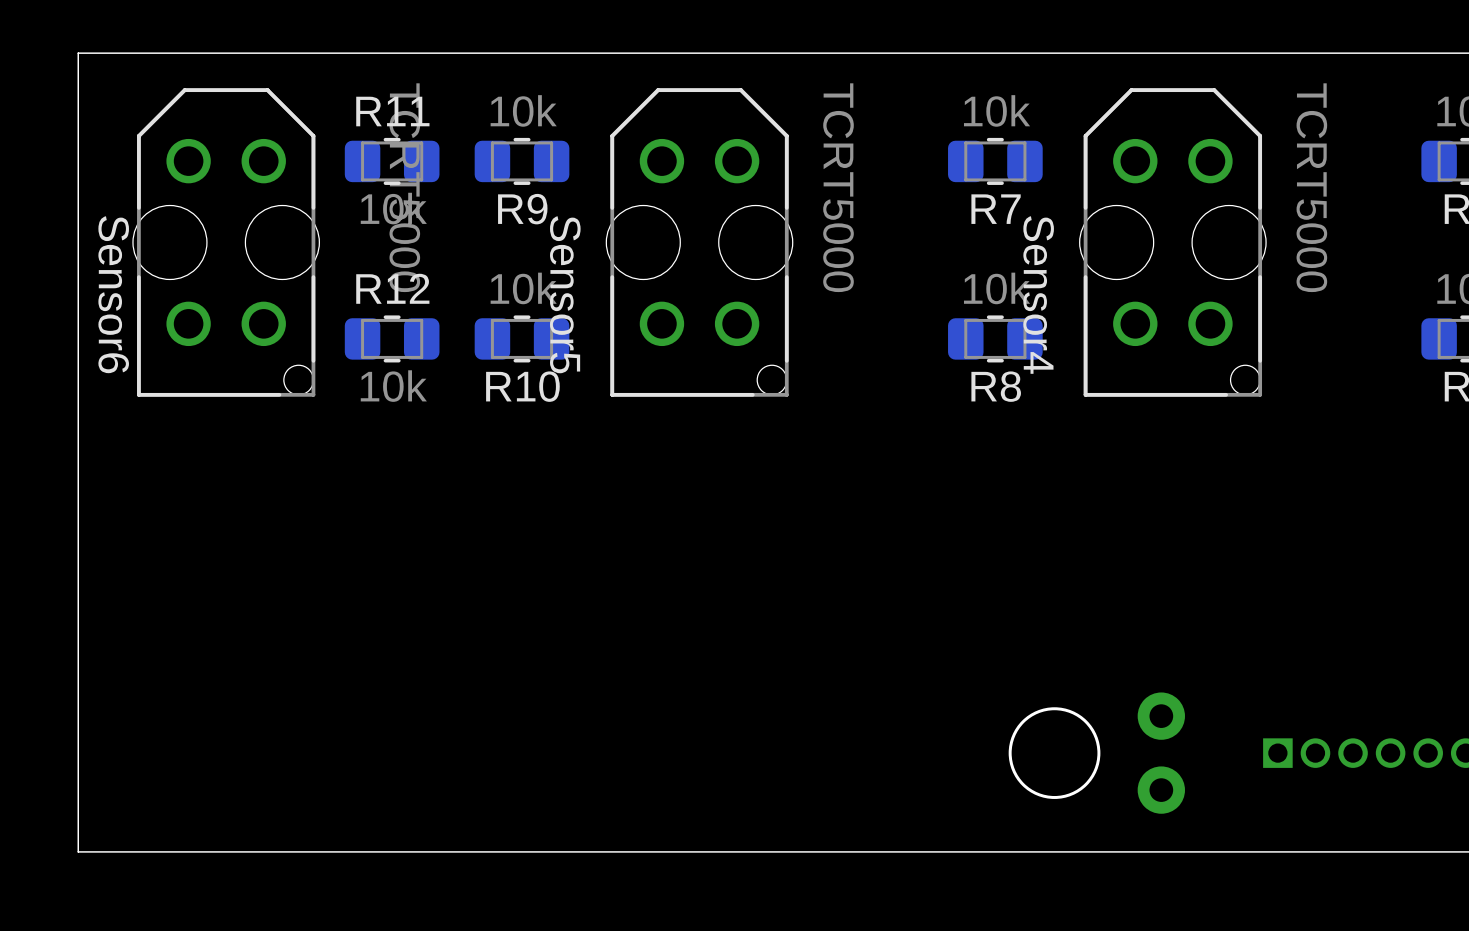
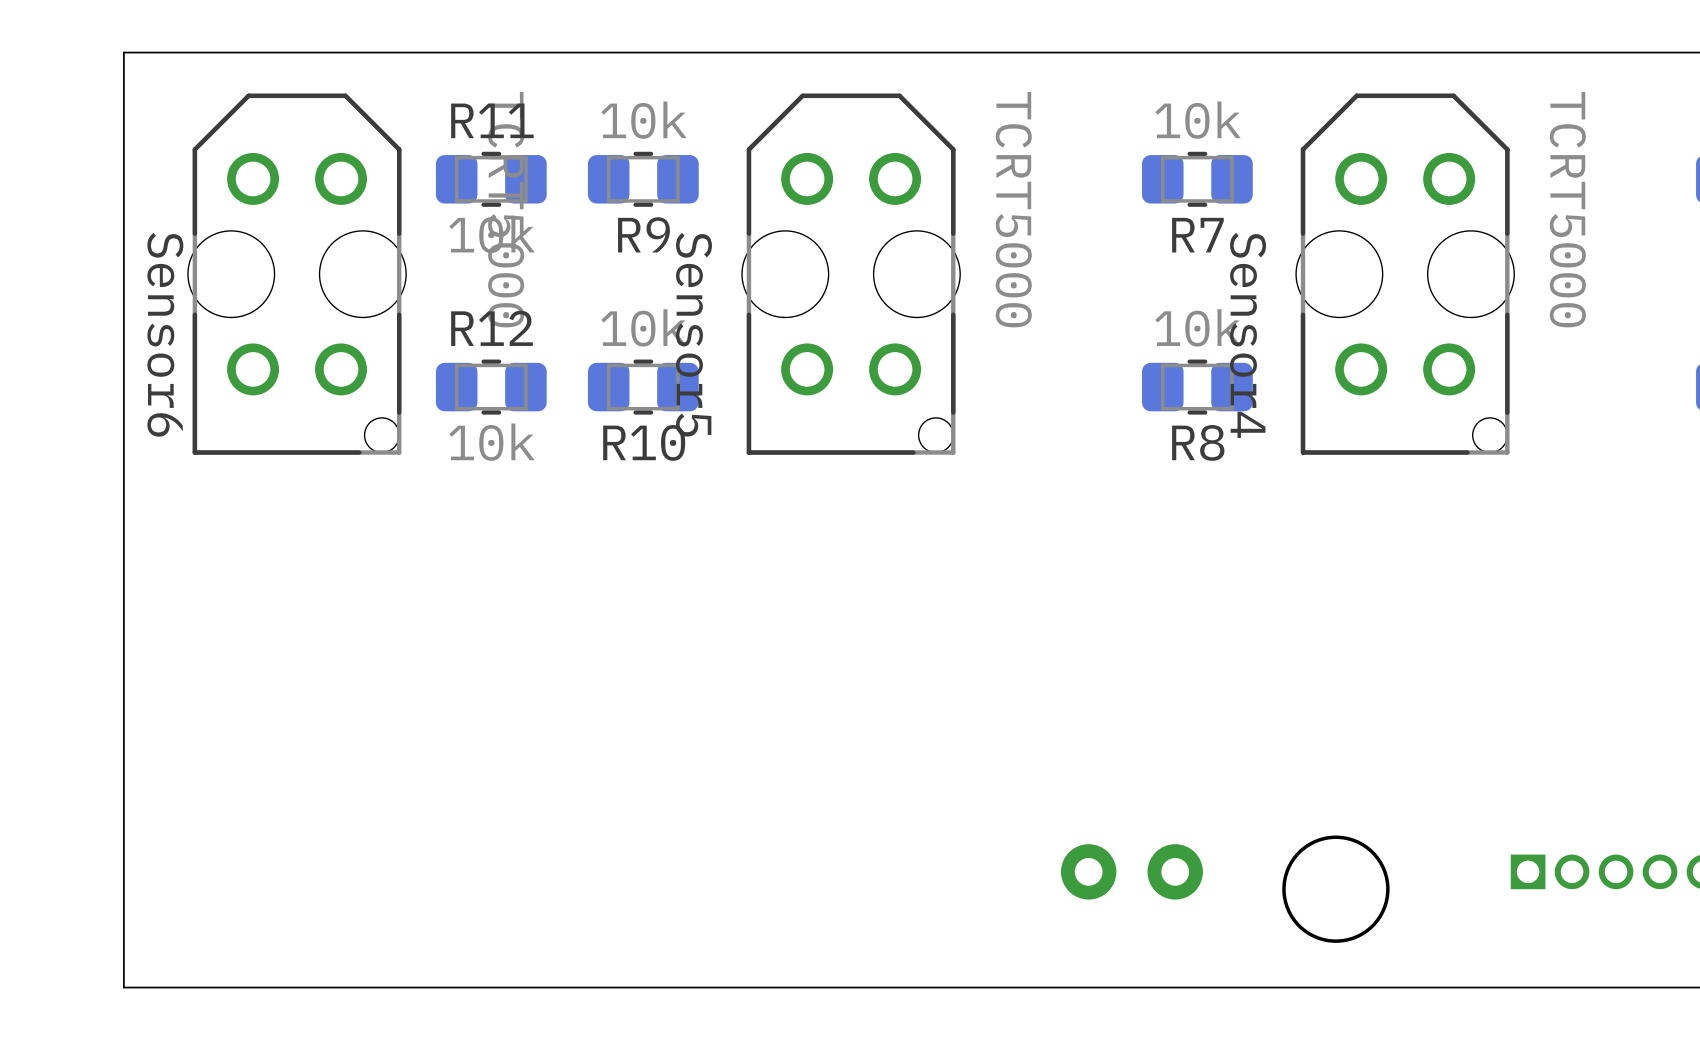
round board edge position: (1054, 753) -> (1335, 889)
part rotation: 0° (1161, 753) -> 90° clockwise (1131, 871)
part position: (1161, 753) -> (1131, 871)

